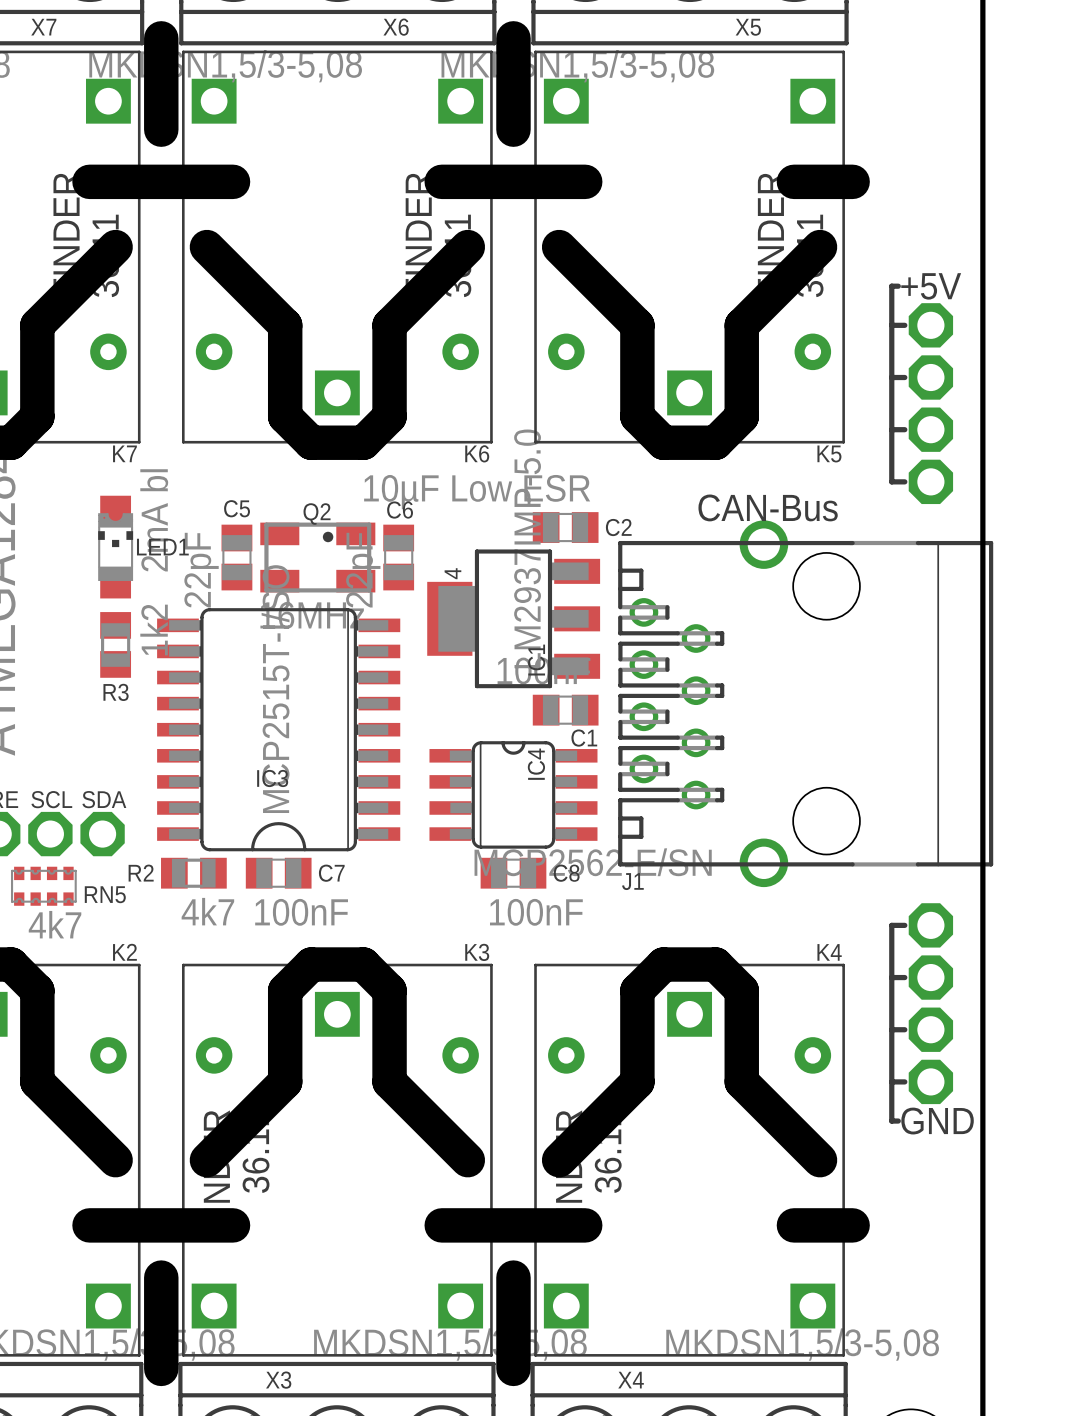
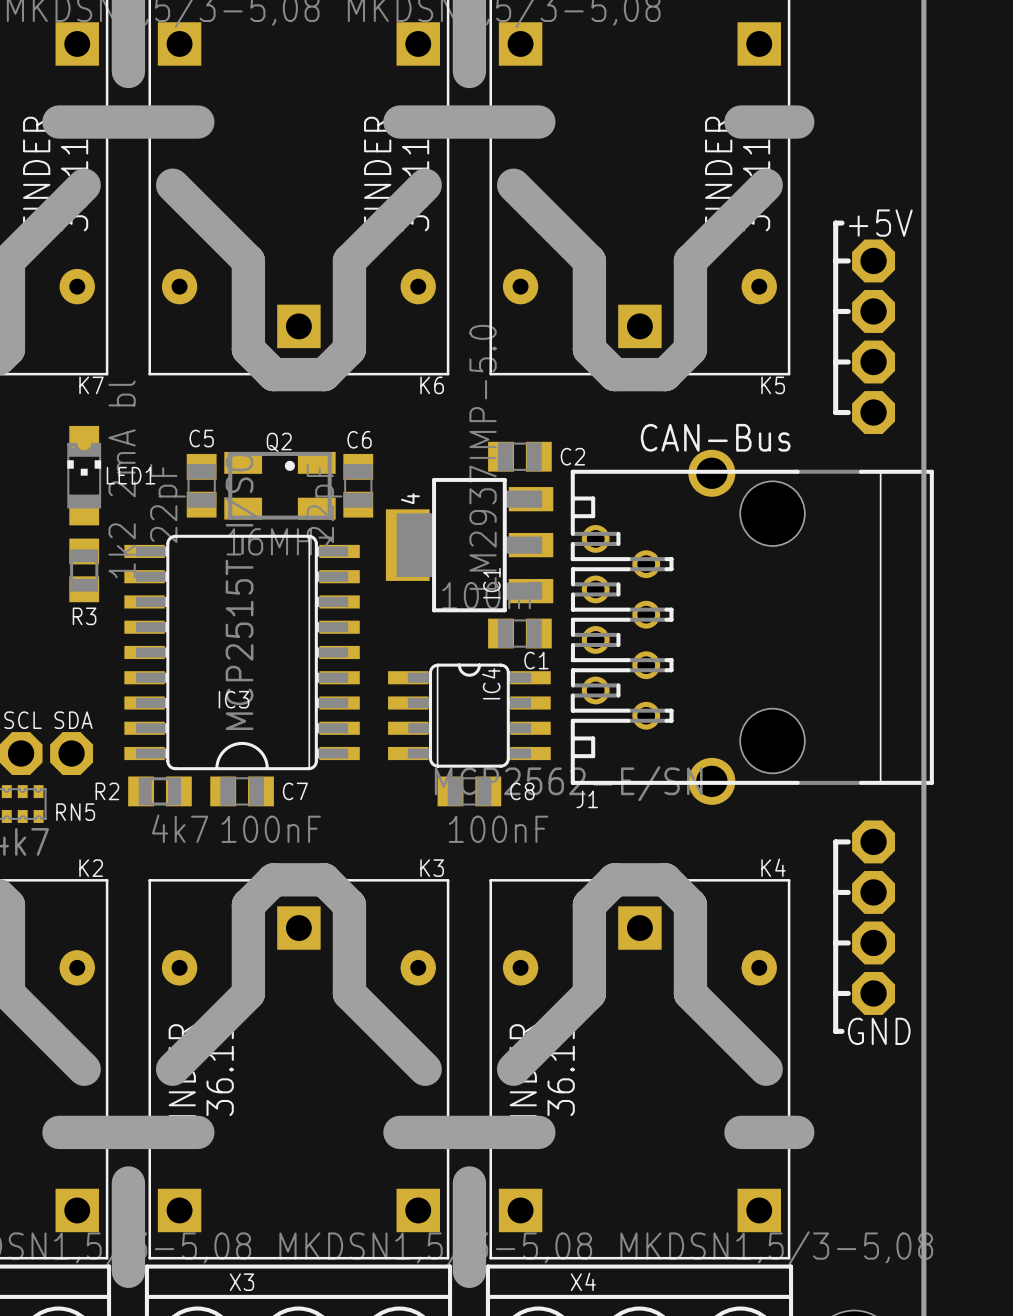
C2 value: 10µF Low ESR (477, 492) -> none

